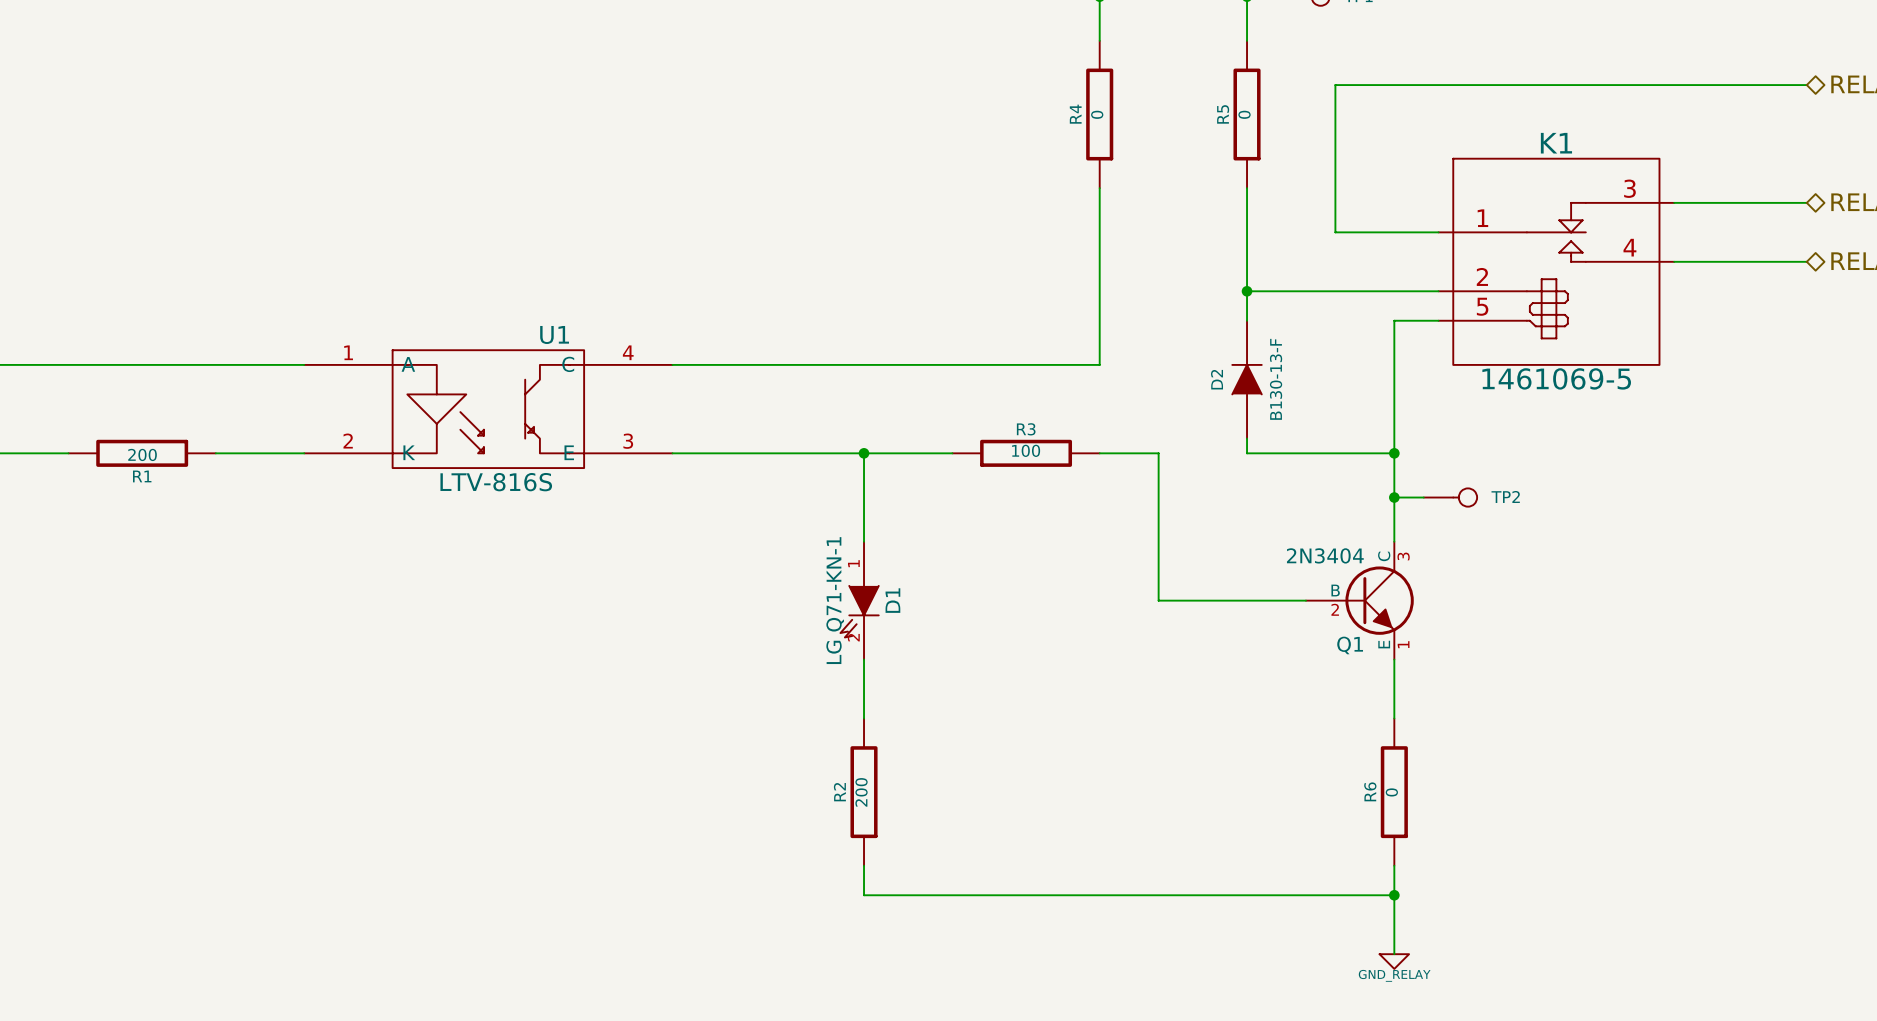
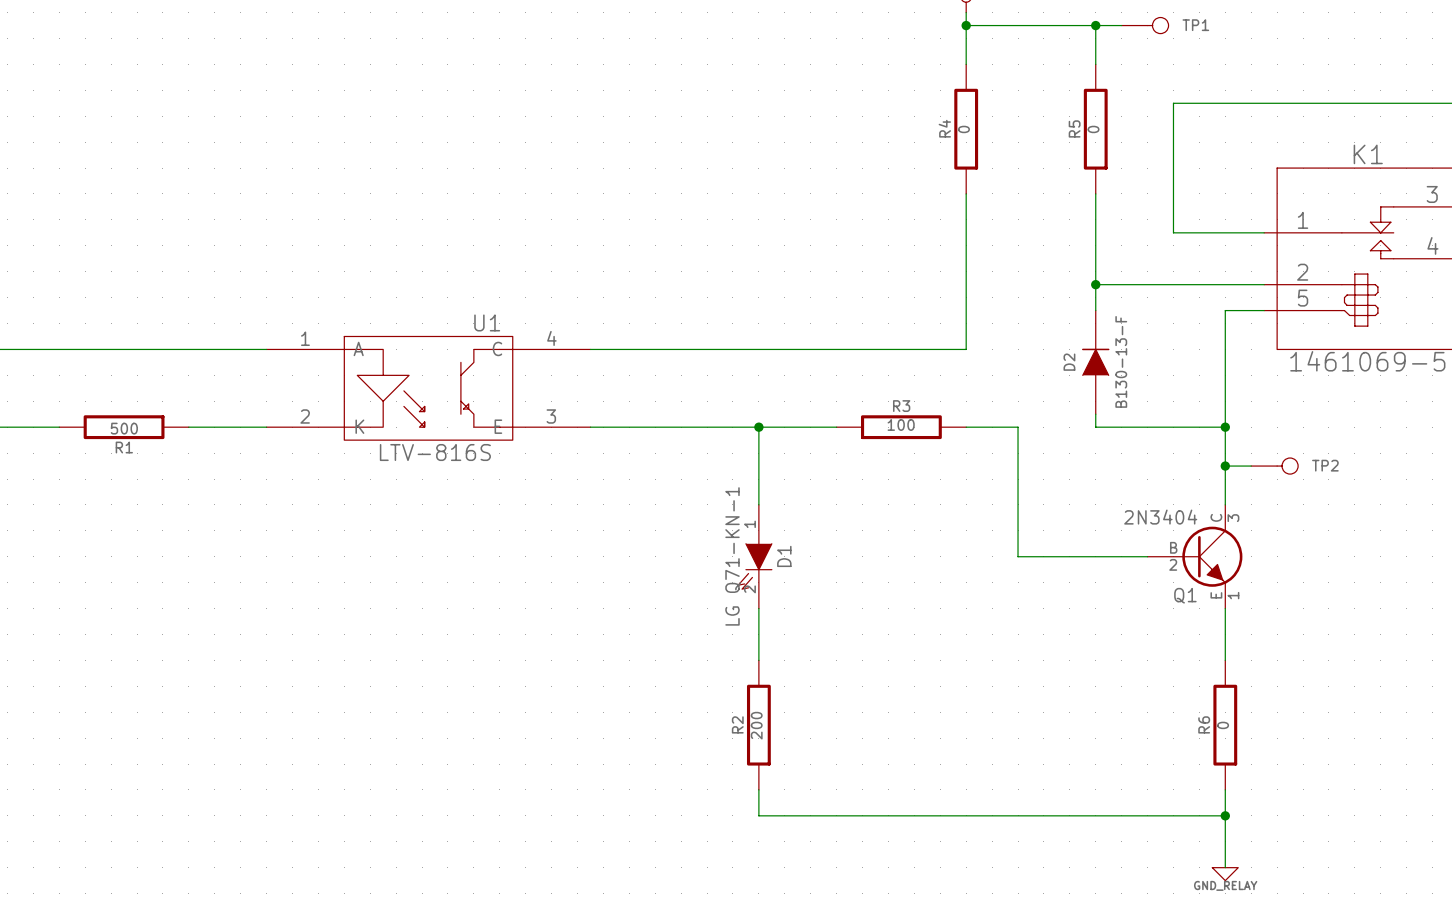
R1 value: 200 (142, 454) -> 500 (124, 428)

